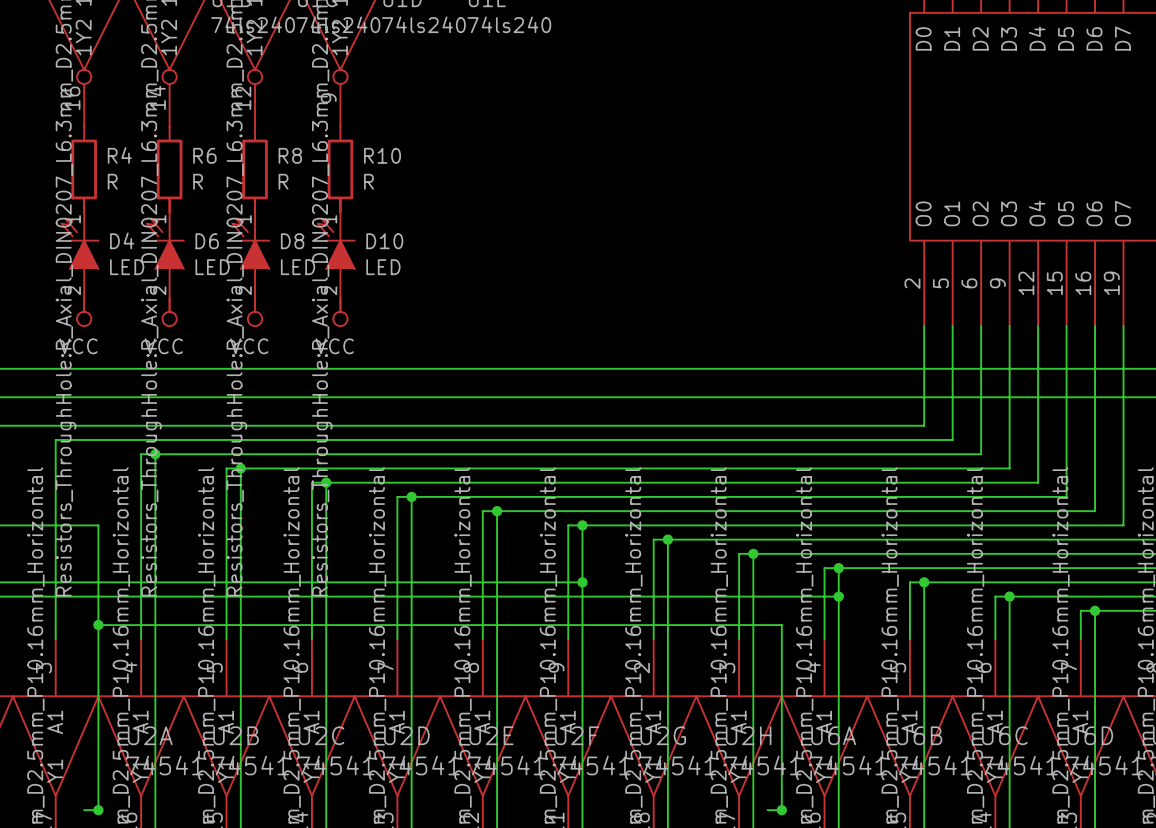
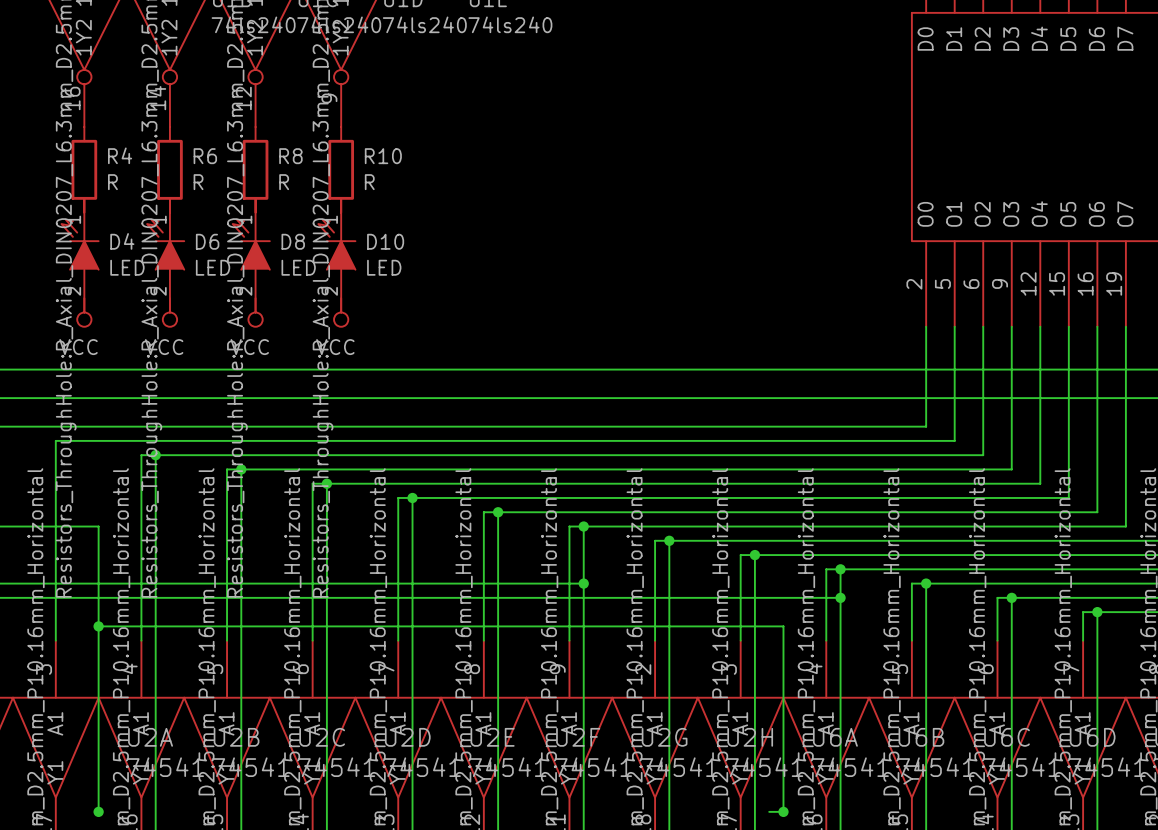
wire: (84, 810) (98, 810) -> none

